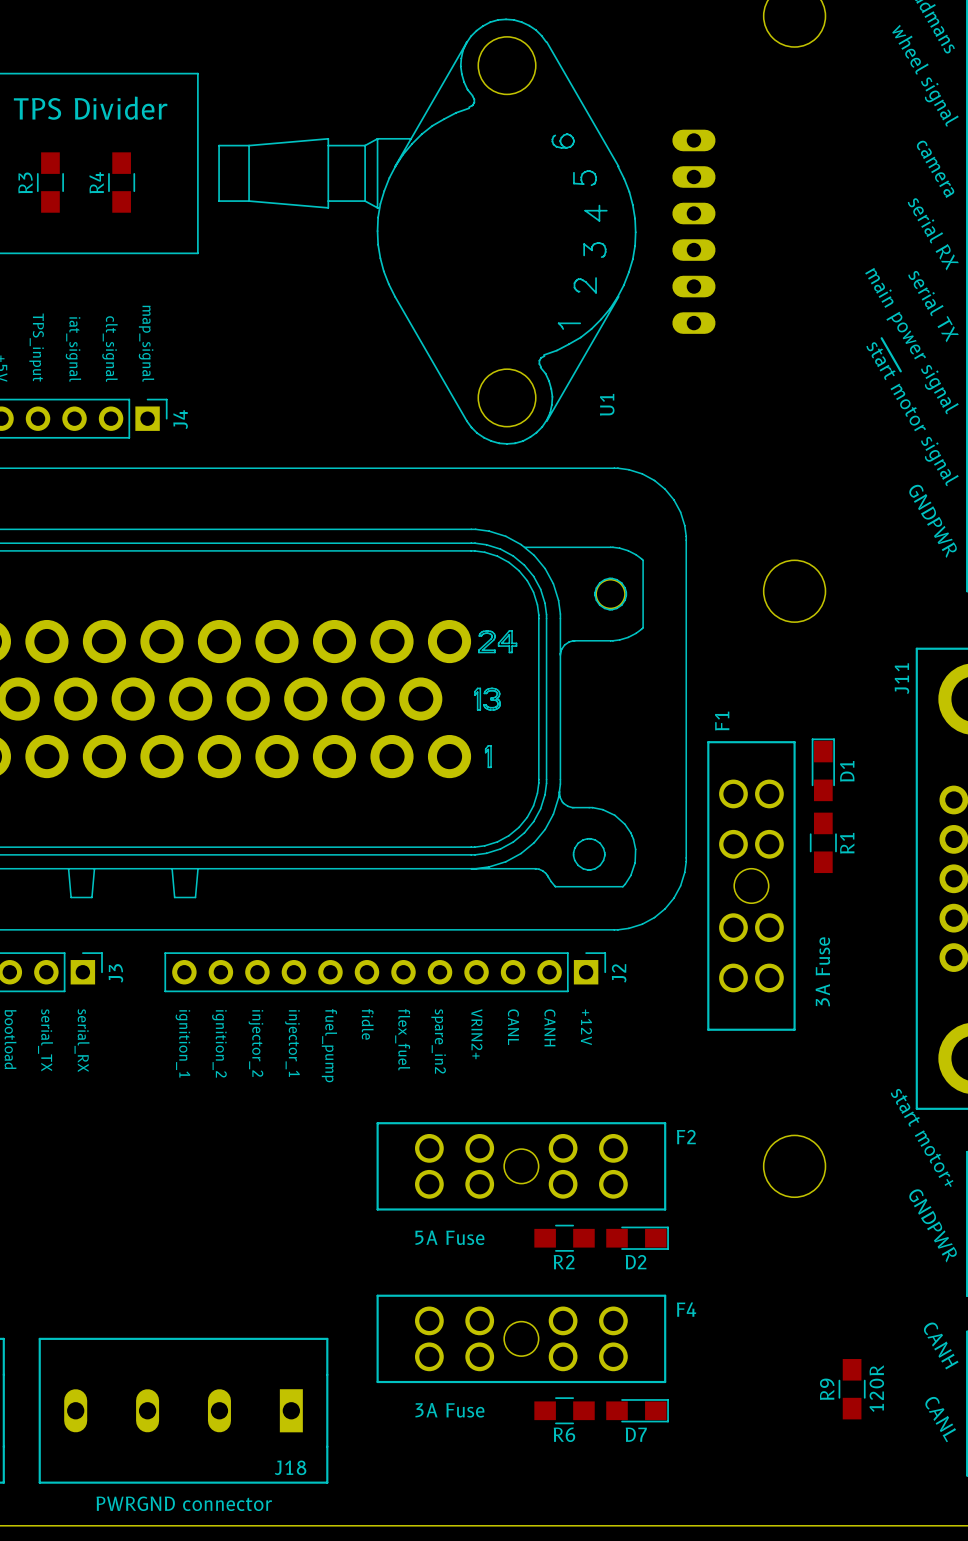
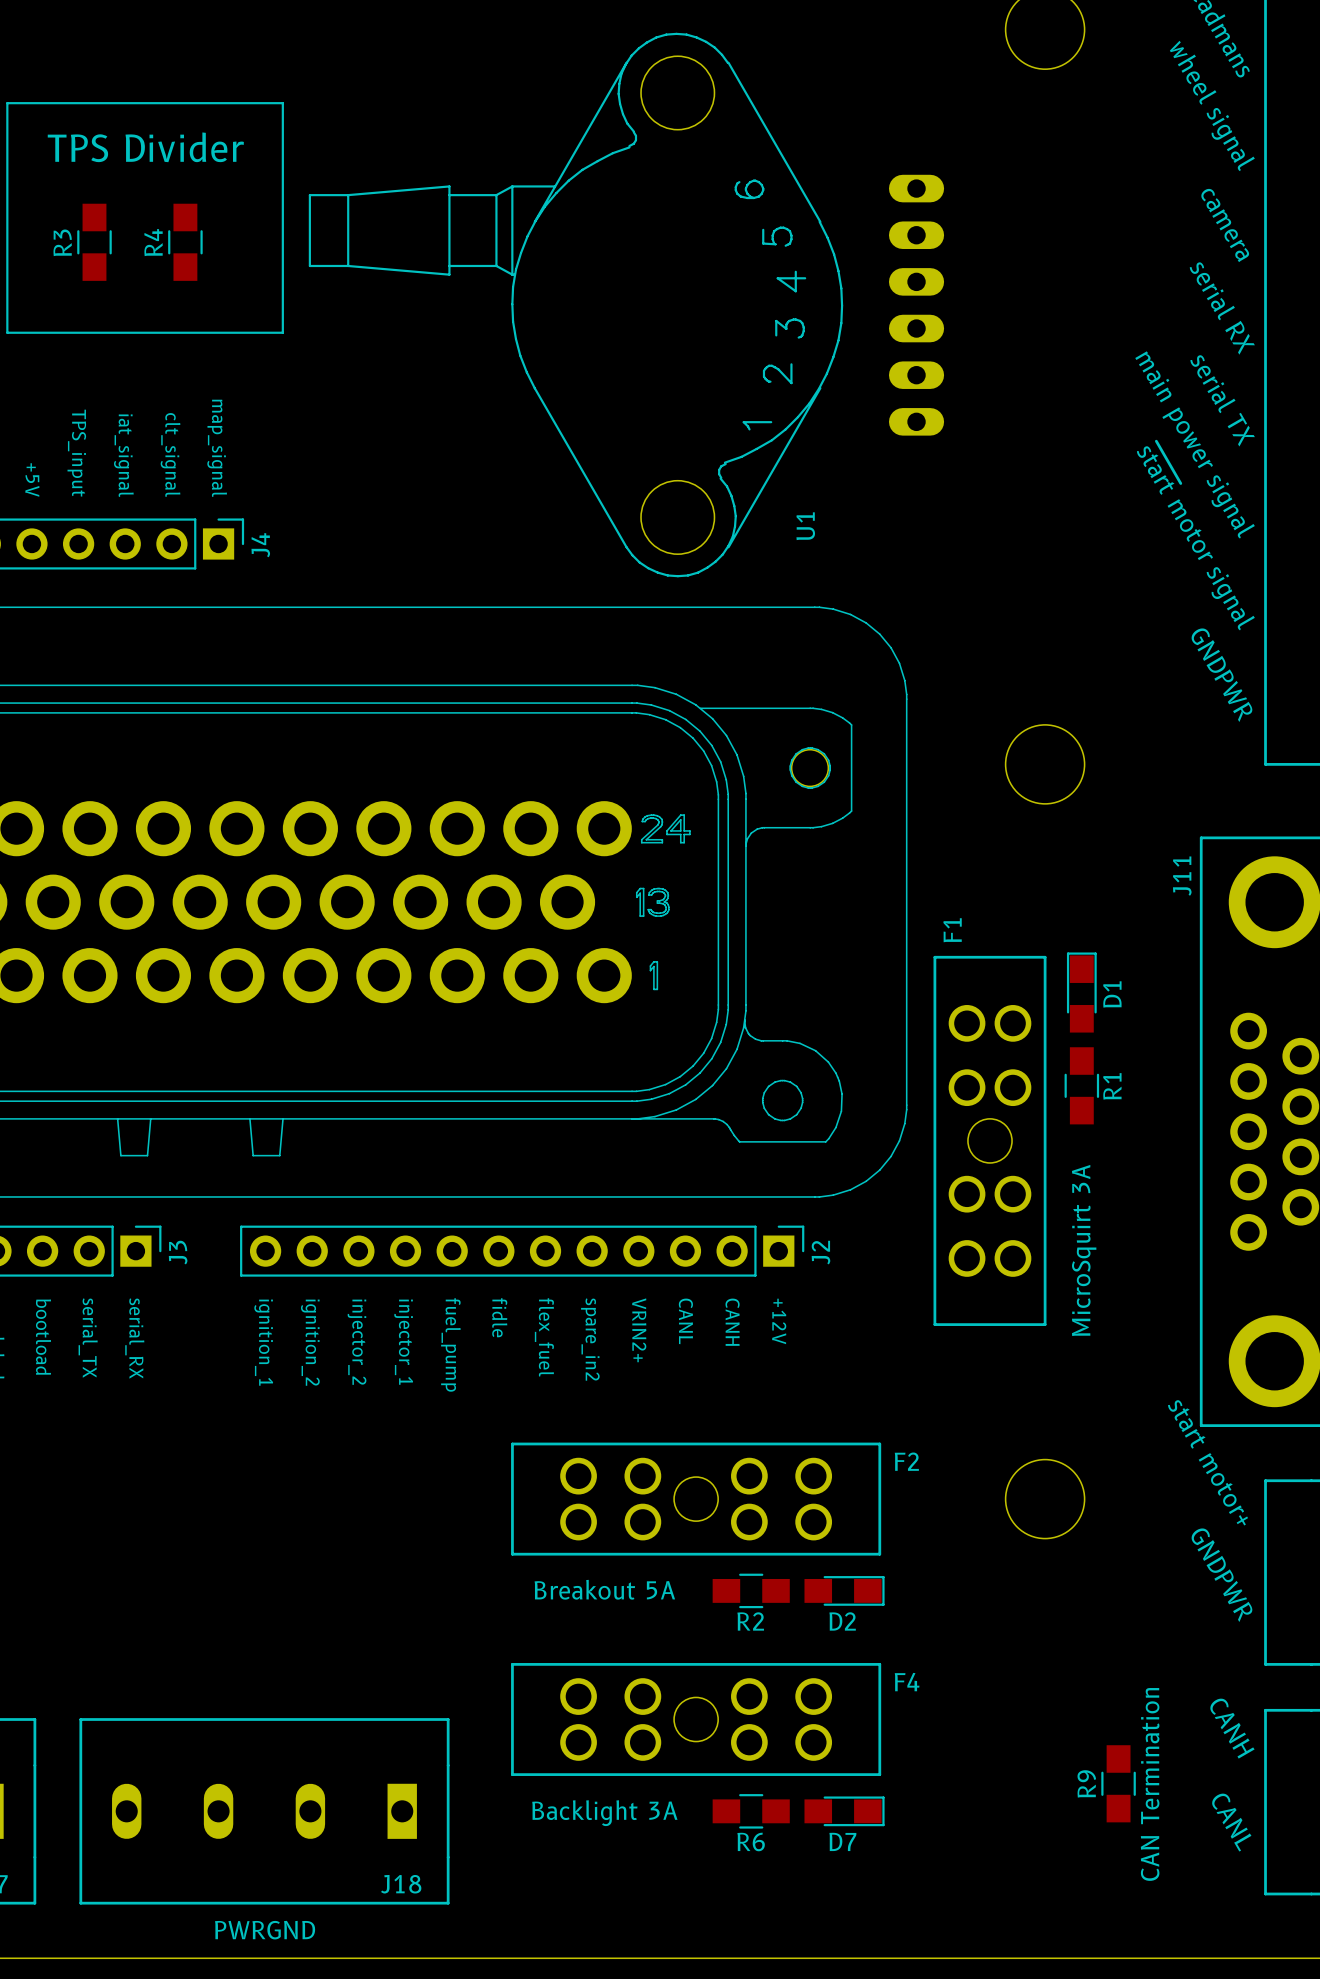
F1 value: 3A Fuse (822, 971) -> MicroSquirt 3A (1084, 1250)
F2 value: 5A Fuse (449, 1237) -> Breakout 5A (604, 1589)
R9 value: 120R (876, 1388) -> CAN Termination (1150, 1784)
F4 value: 3A Fuse (449, 1410) -> Backlight 3A (604, 1813)
J18 value: PWRGND connector (184, 1503) -> PWRGND (265, 1930)

